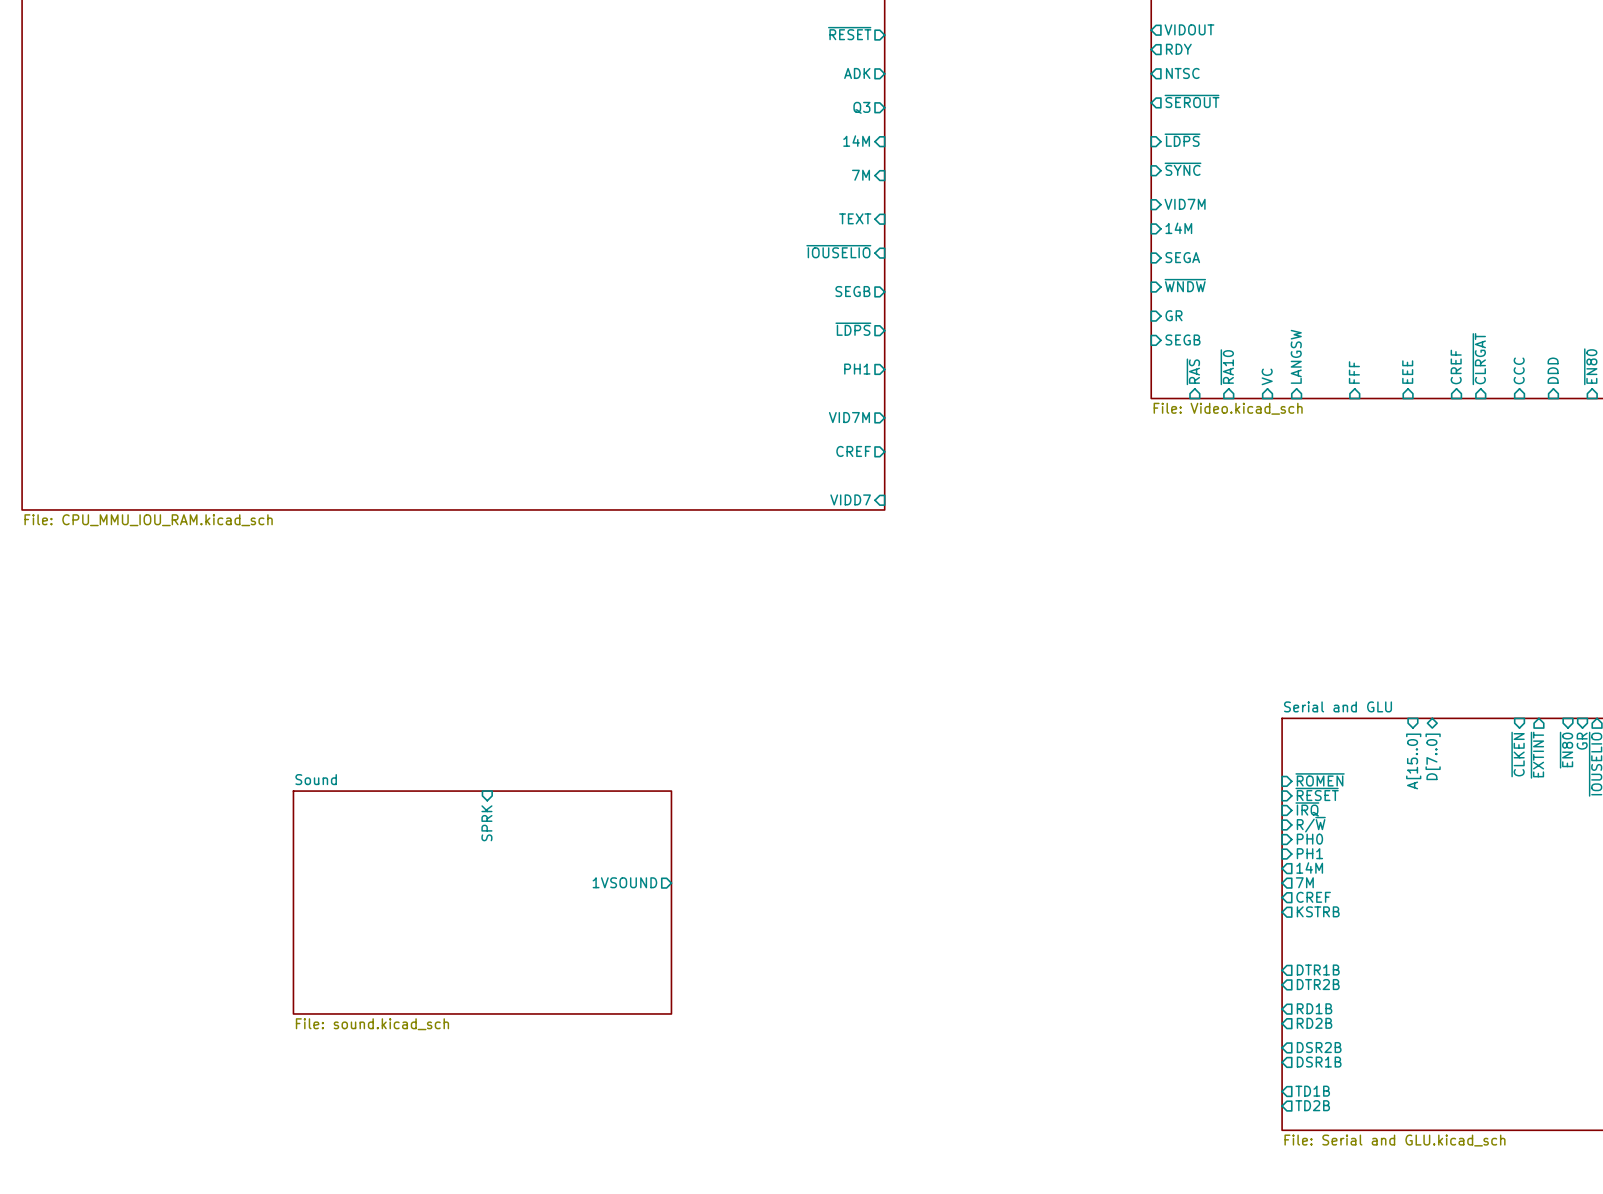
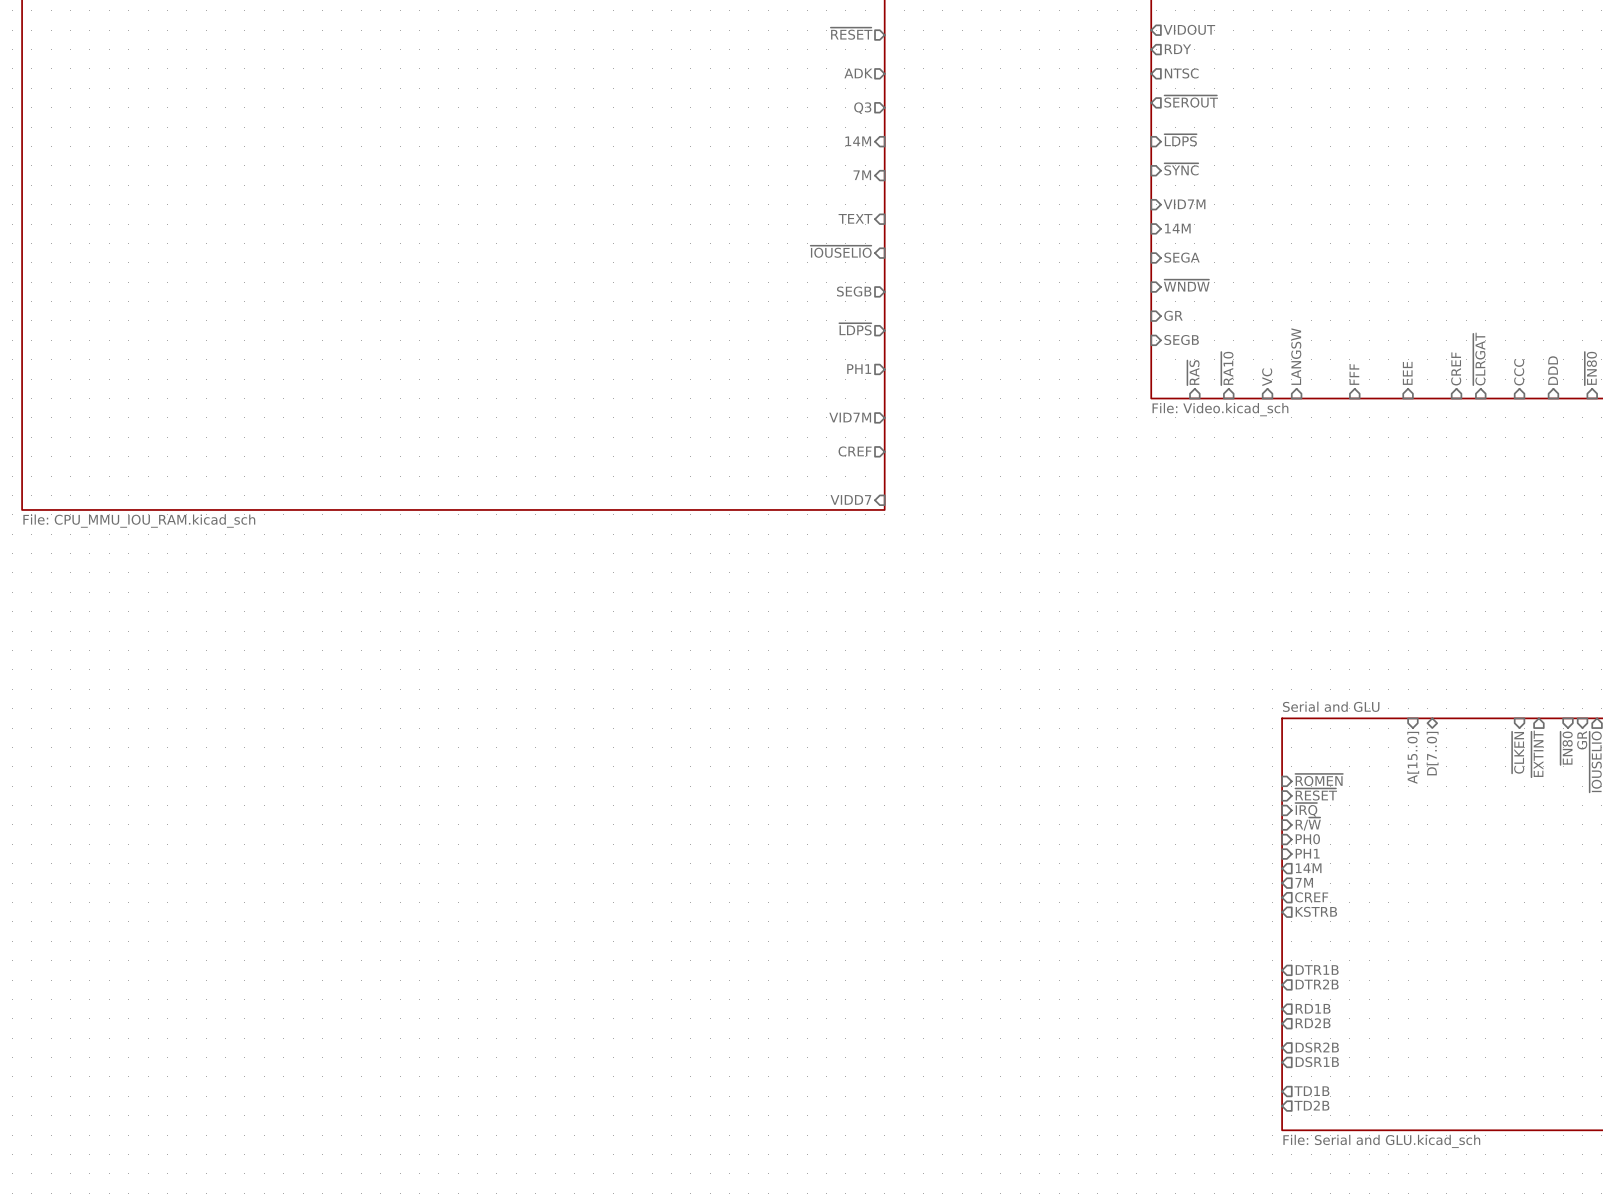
sheet pin: SPRK (486, 823) -> none
sheet pin: 1VSOUND (624, 882) -> none
sheet Sound: File: sound.kicad_sch (482, 902) -> none

